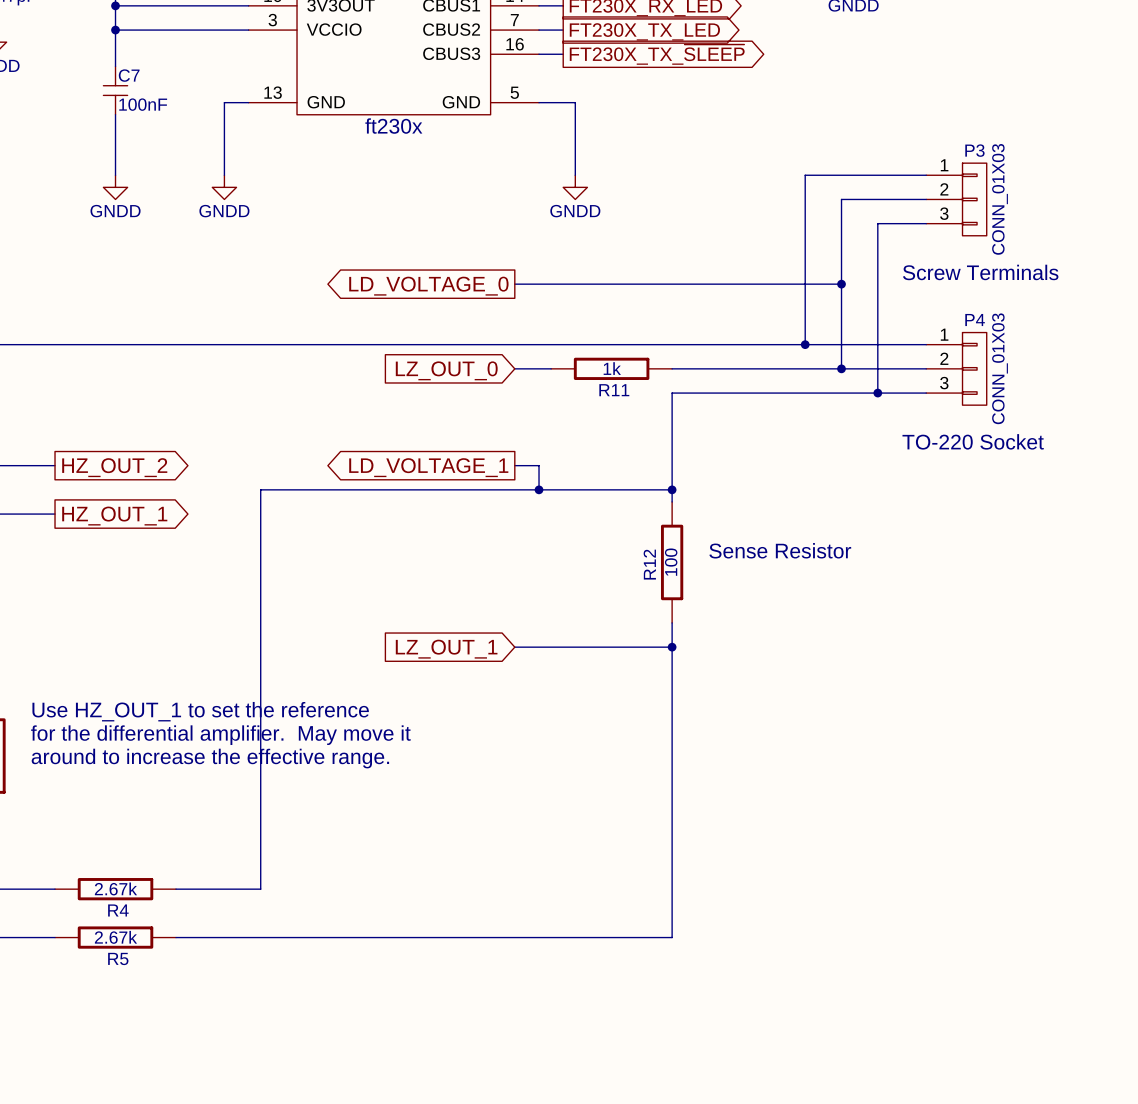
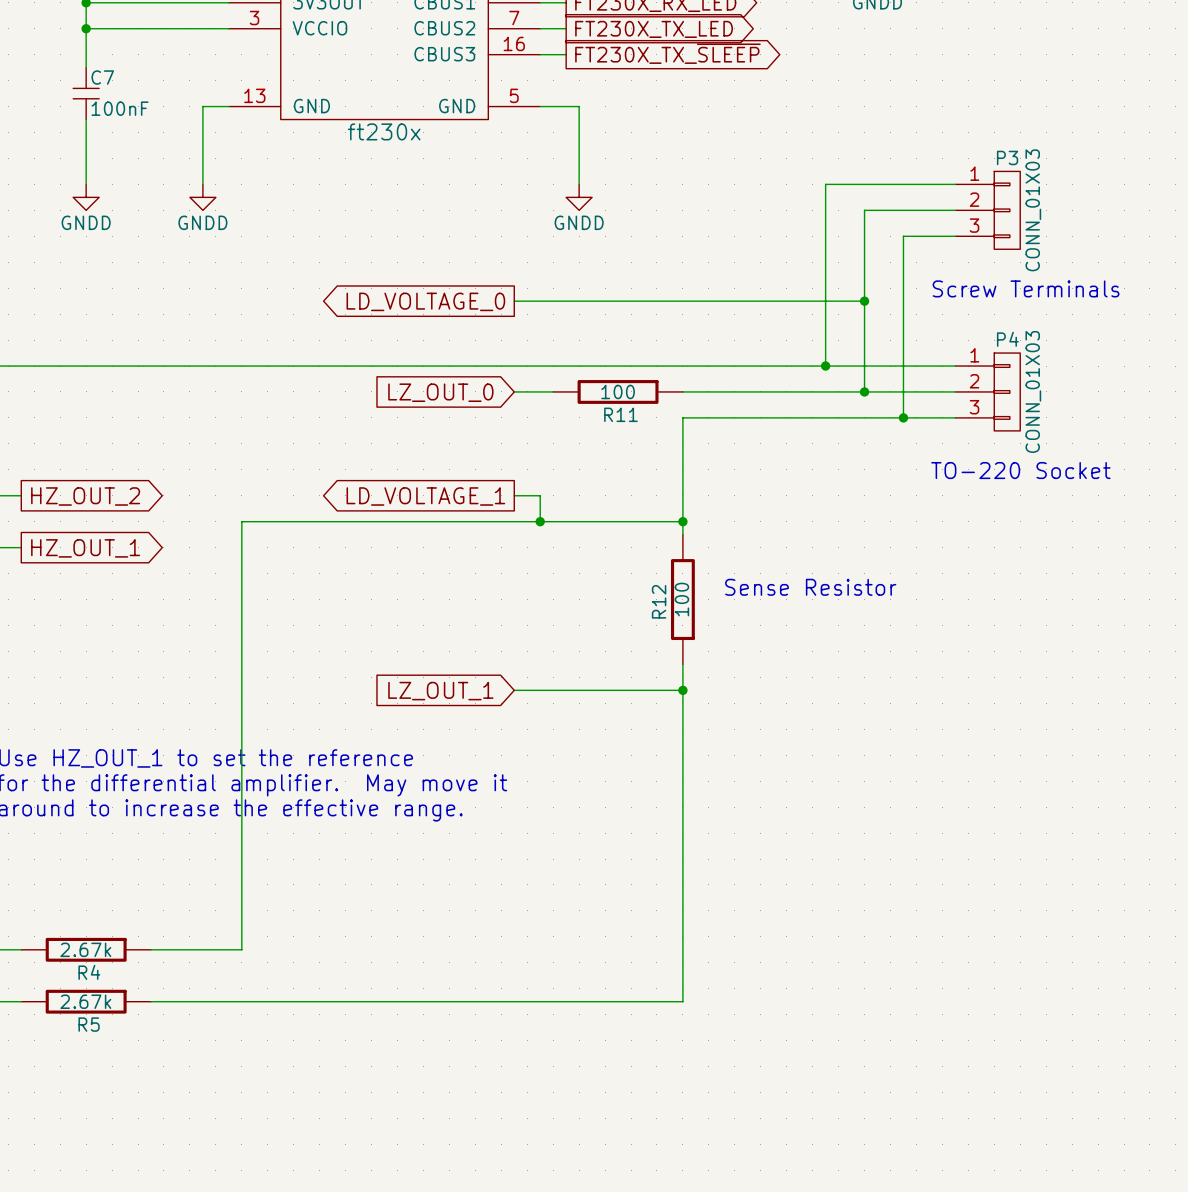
R11 value: 1k (612, 368) -> 100 (618, 392)

